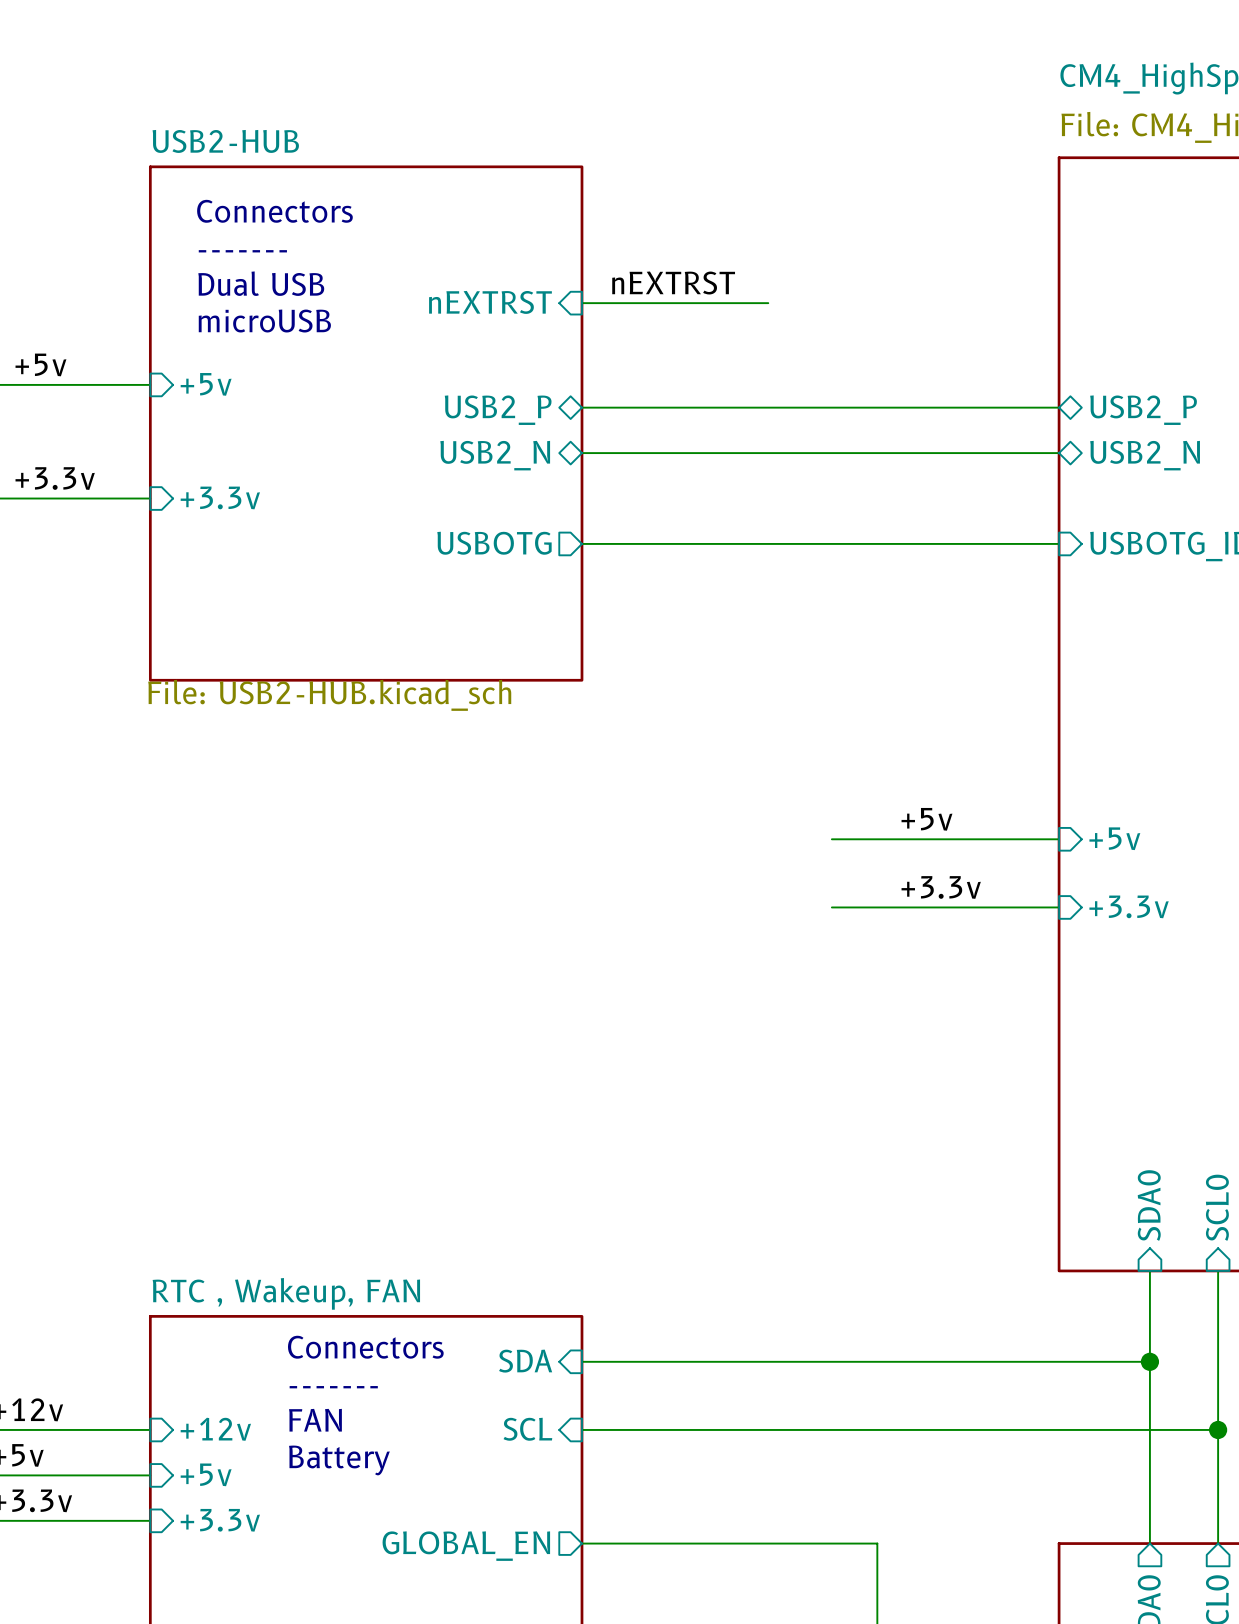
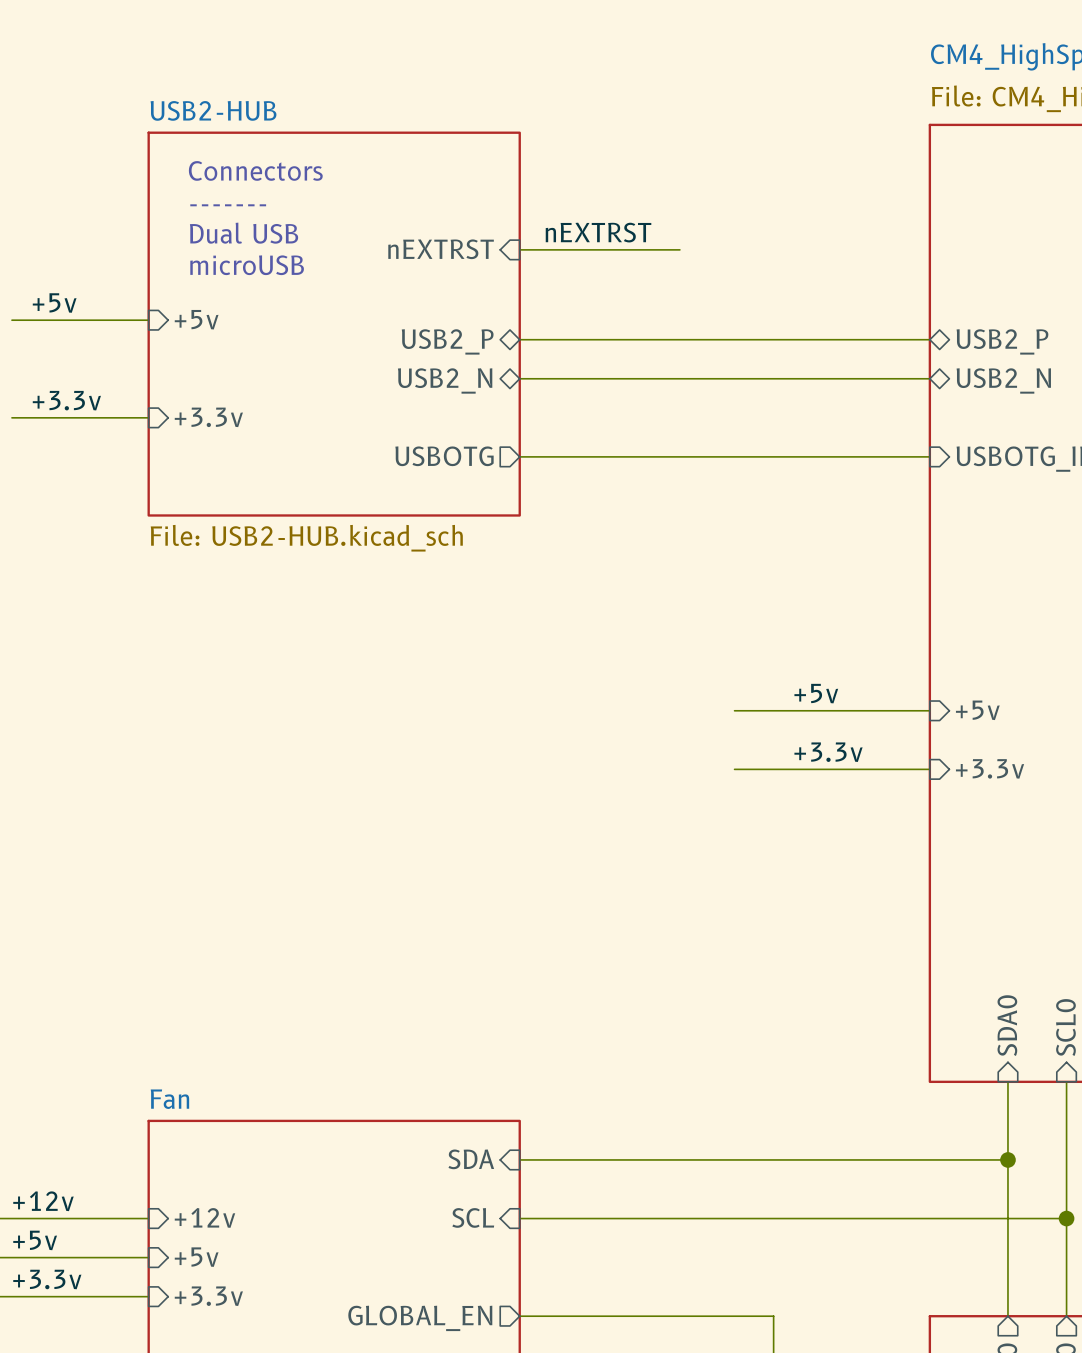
sheet USB2-HUB shape: [148, 165, 584, 682] -> [147, 131, 521, 517]
sheet RTC , Wakeup, FAN name: RTC , Wakeup, FAN (286, 1293) -> Fan (169, 1099)
text: Connectors (365, 1347) -> none
text: ------- (333, 1387) -> none
text: FAN (315, 1420) -> none
text: Battery (339, 1460) -> none

